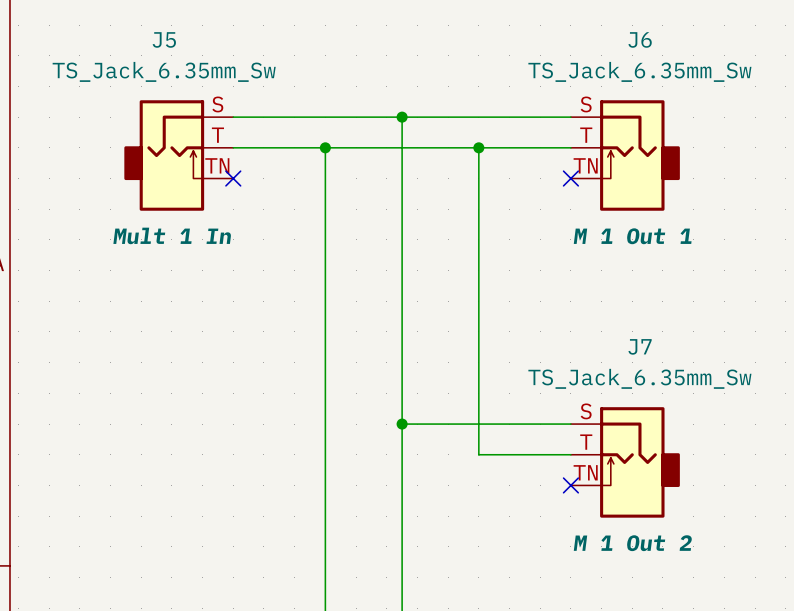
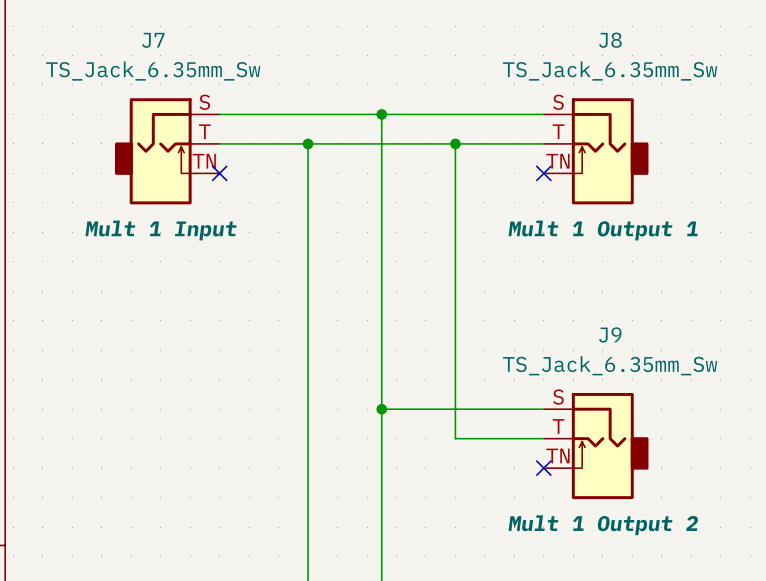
J5 name: J5 (164, 39) -> J7 (153, 40)
J6 name: J6 (640, 39) -> J8 (610, 40)
J5 text: Mult 1 In (172, 235) -> Mult 1 Input (161, 230)
J6 text: M 1 Out 1 (632, 236) -> Mult 1 Output 1 (603, 230)
J7 name: J7 (640, 346) -> J9 (610, 334)
J7 text: M 1 Out 2 (632, 543) -> Mult 1 Output 2 (603, 525)

